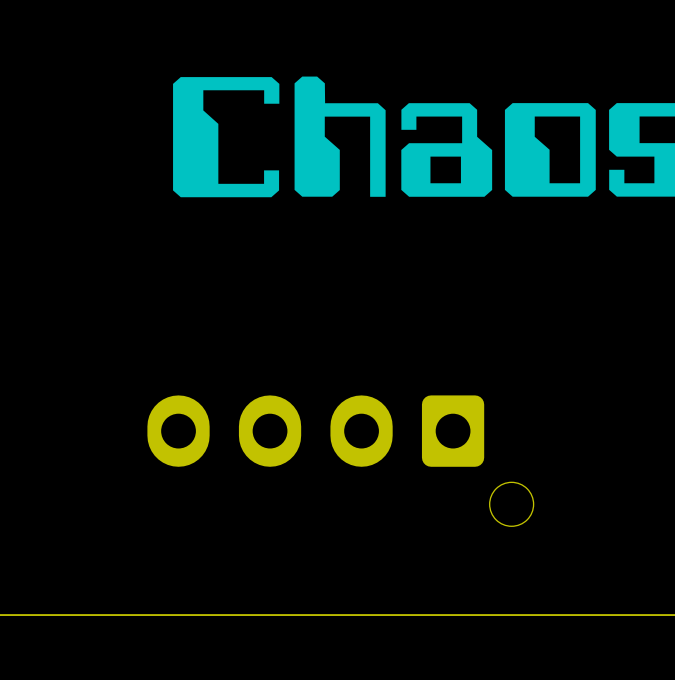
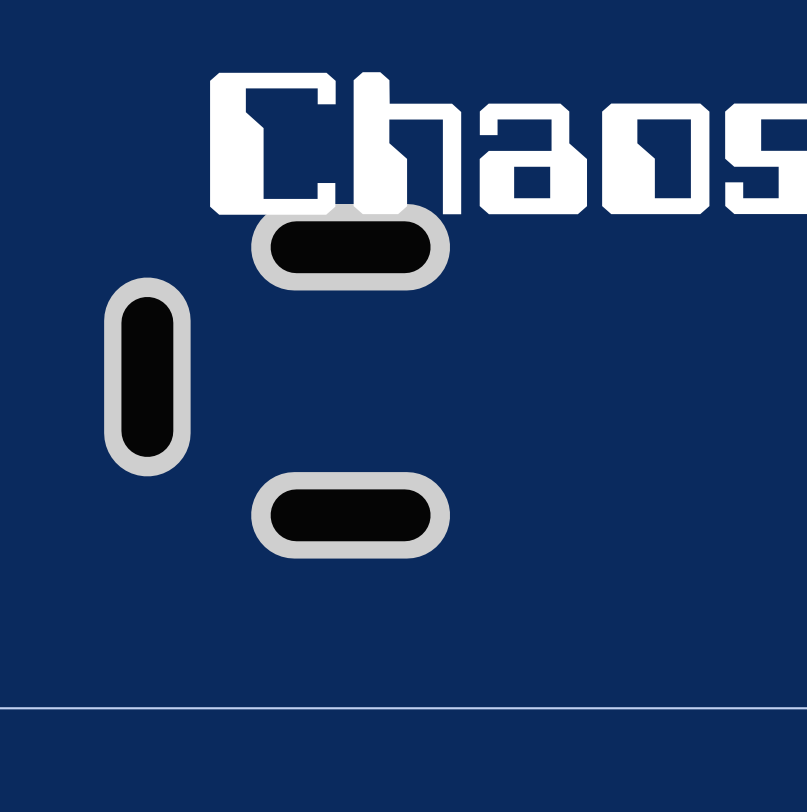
part: none -> (277, 381)
part: (340, 460) -> none

